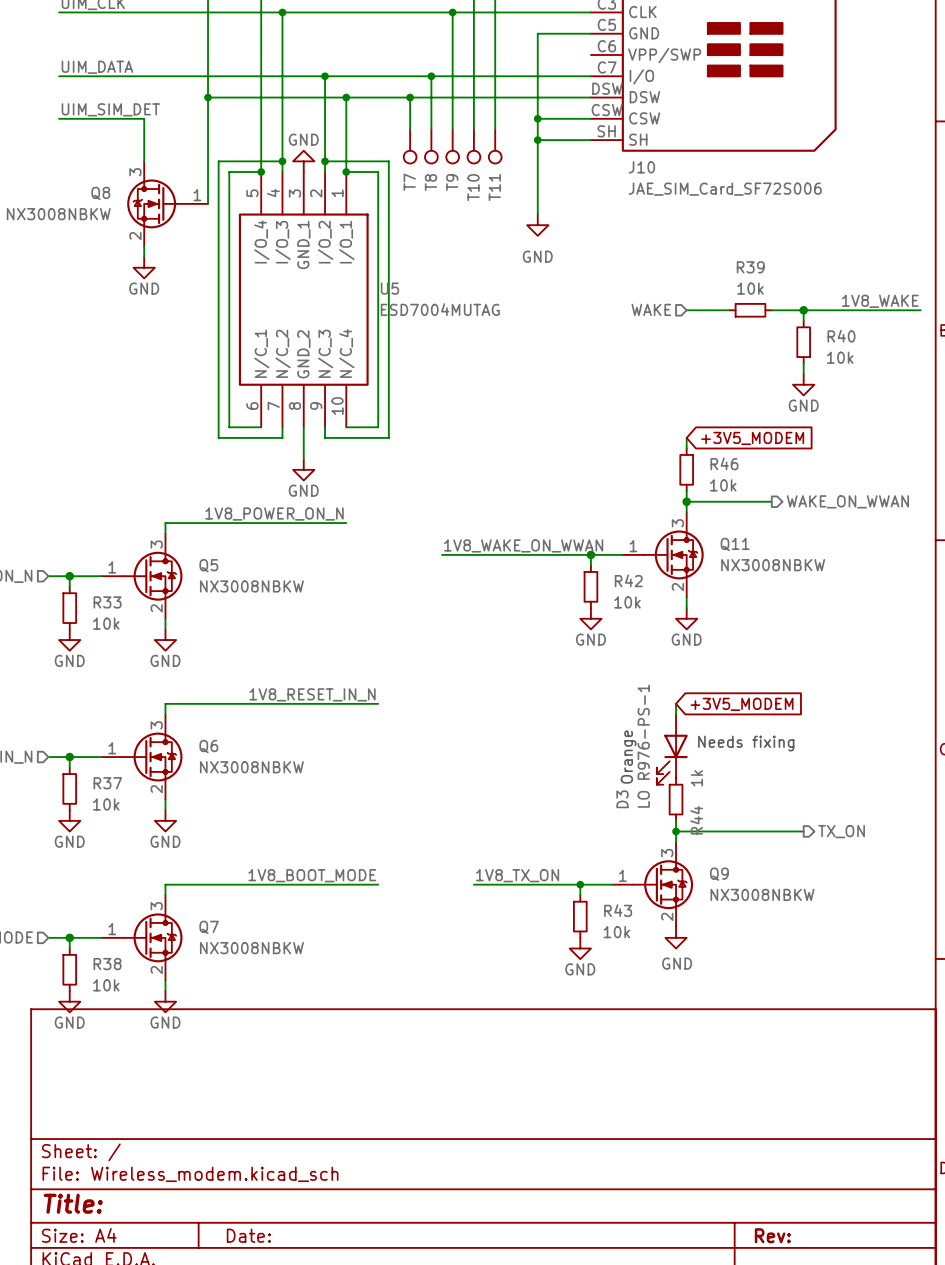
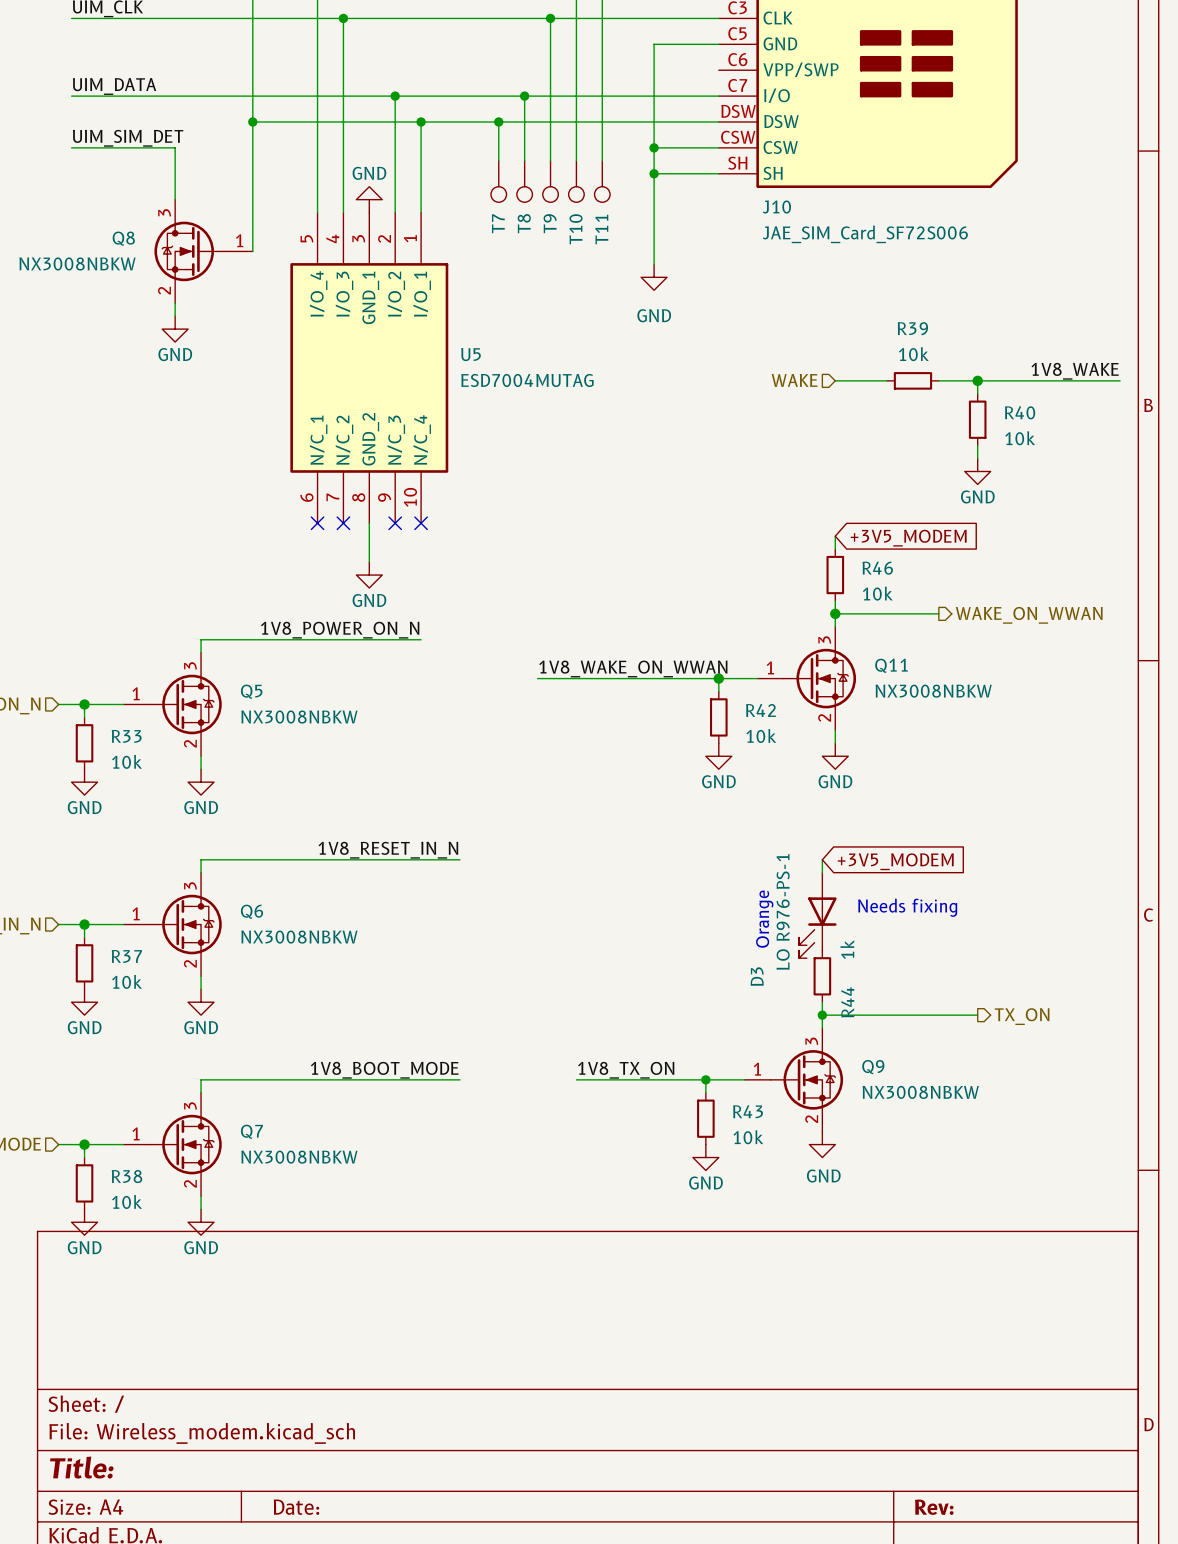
wire: (282, 161) (218, 161) (218, 437) (282, 437) (282, 427) -> none
junction: (282, 161) -> none
wire: (325, 161) (388, 161) (388, 437) (325, 437) (325, 427) -> none
junction: (325, 161) -> none
wire: (261, 172) (229, 172) (229, 427) (261, 427) -> none
junction: (261, 172) -> none
wire: (346, 172) (378, 172) (378, 427) (346, 427) -> none
junction: (346, 172) -> none
no-connect mark: none -> (317, 523)
no-connect mark: none -> (343, 523)
no-connect mark: none -> (395, 523)
no-connect mark: none -> (421, 523)

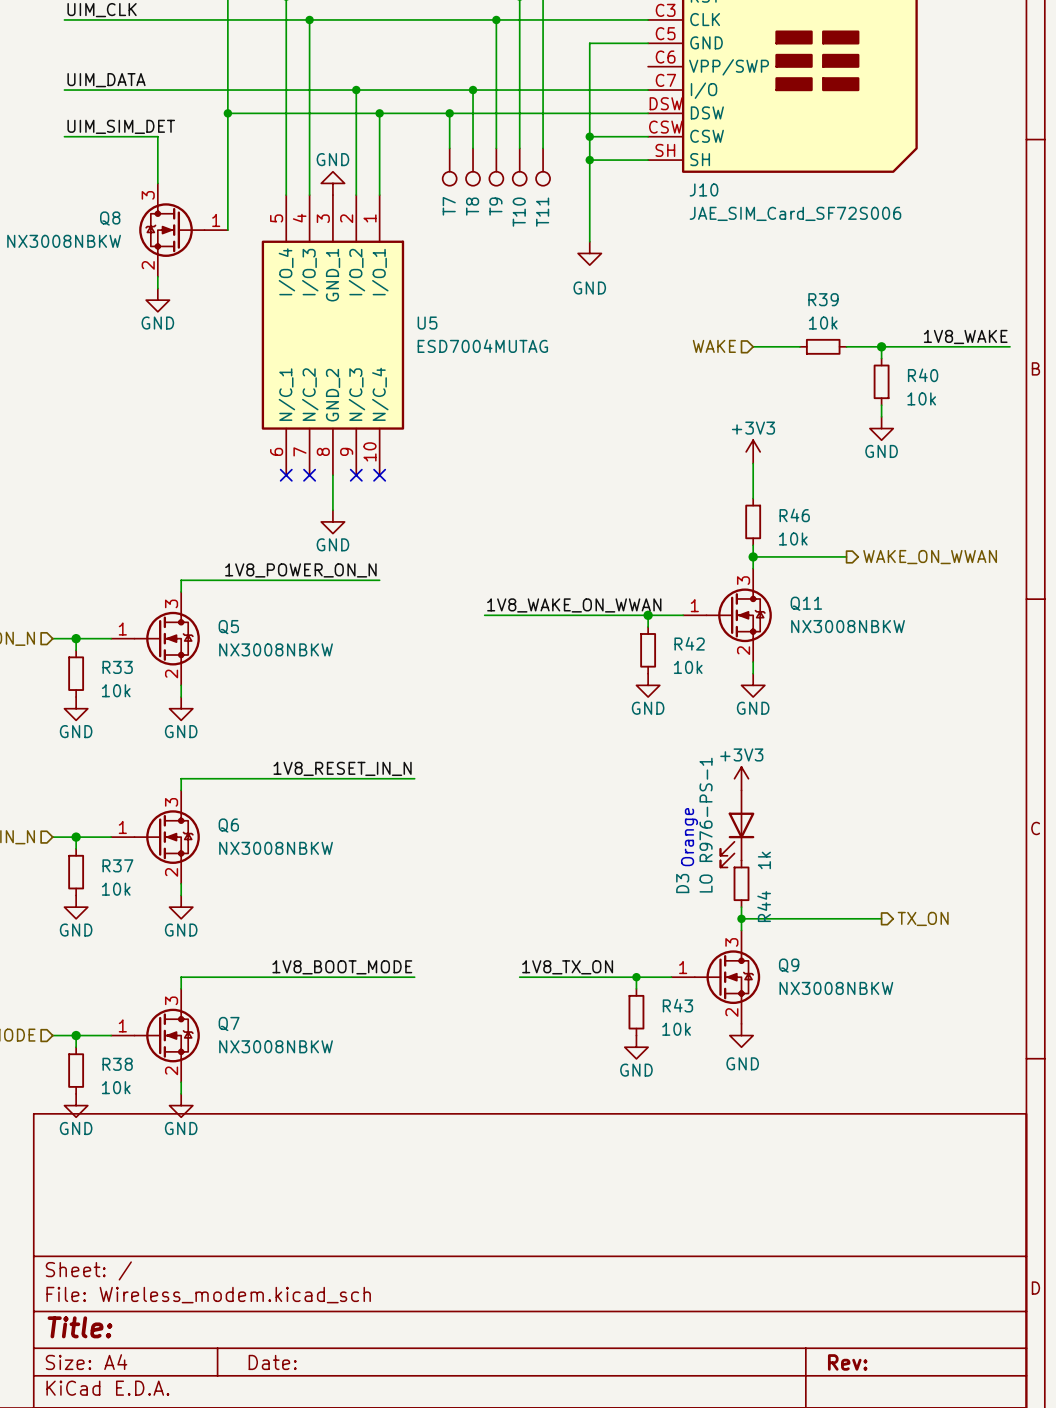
power symbol: none -> +3V3 (753, 451)
wire: none -> (753, 463) (753, 486)
global label: +3V5_MODEM (908, 538) -> none
power symbol: none -> +3V3 (741, 778)
global label: +3V5_MODEM (895, 861) -> none
text: Needs fixing (907, 907) -> none

